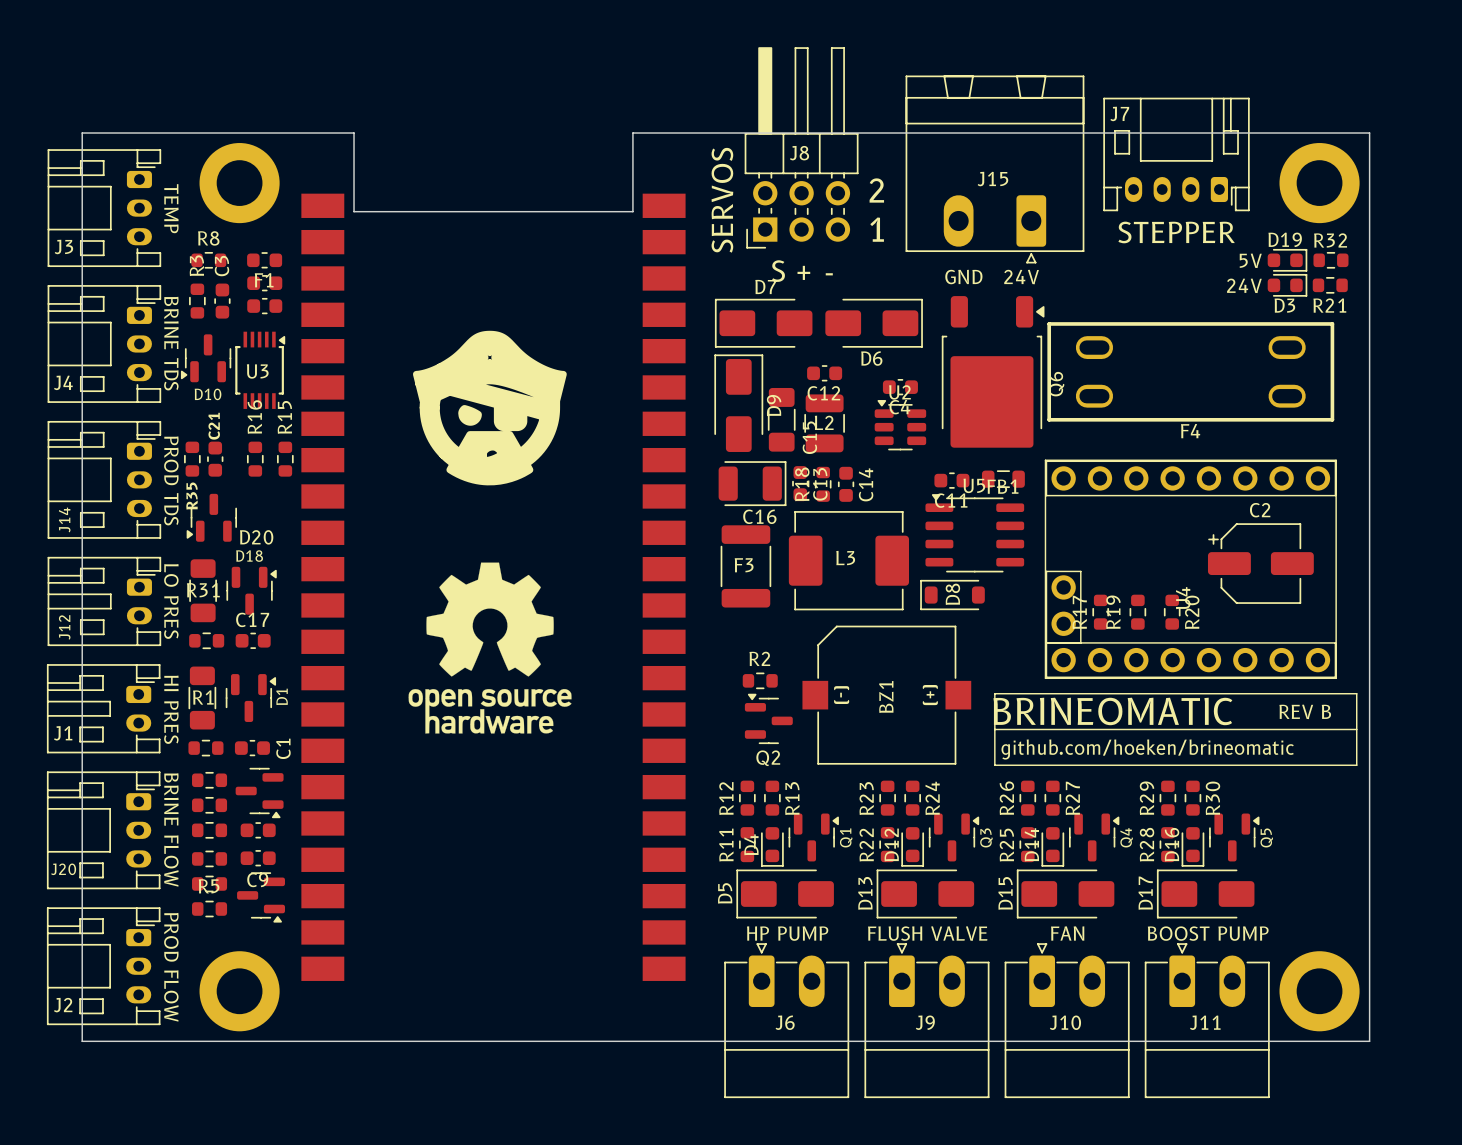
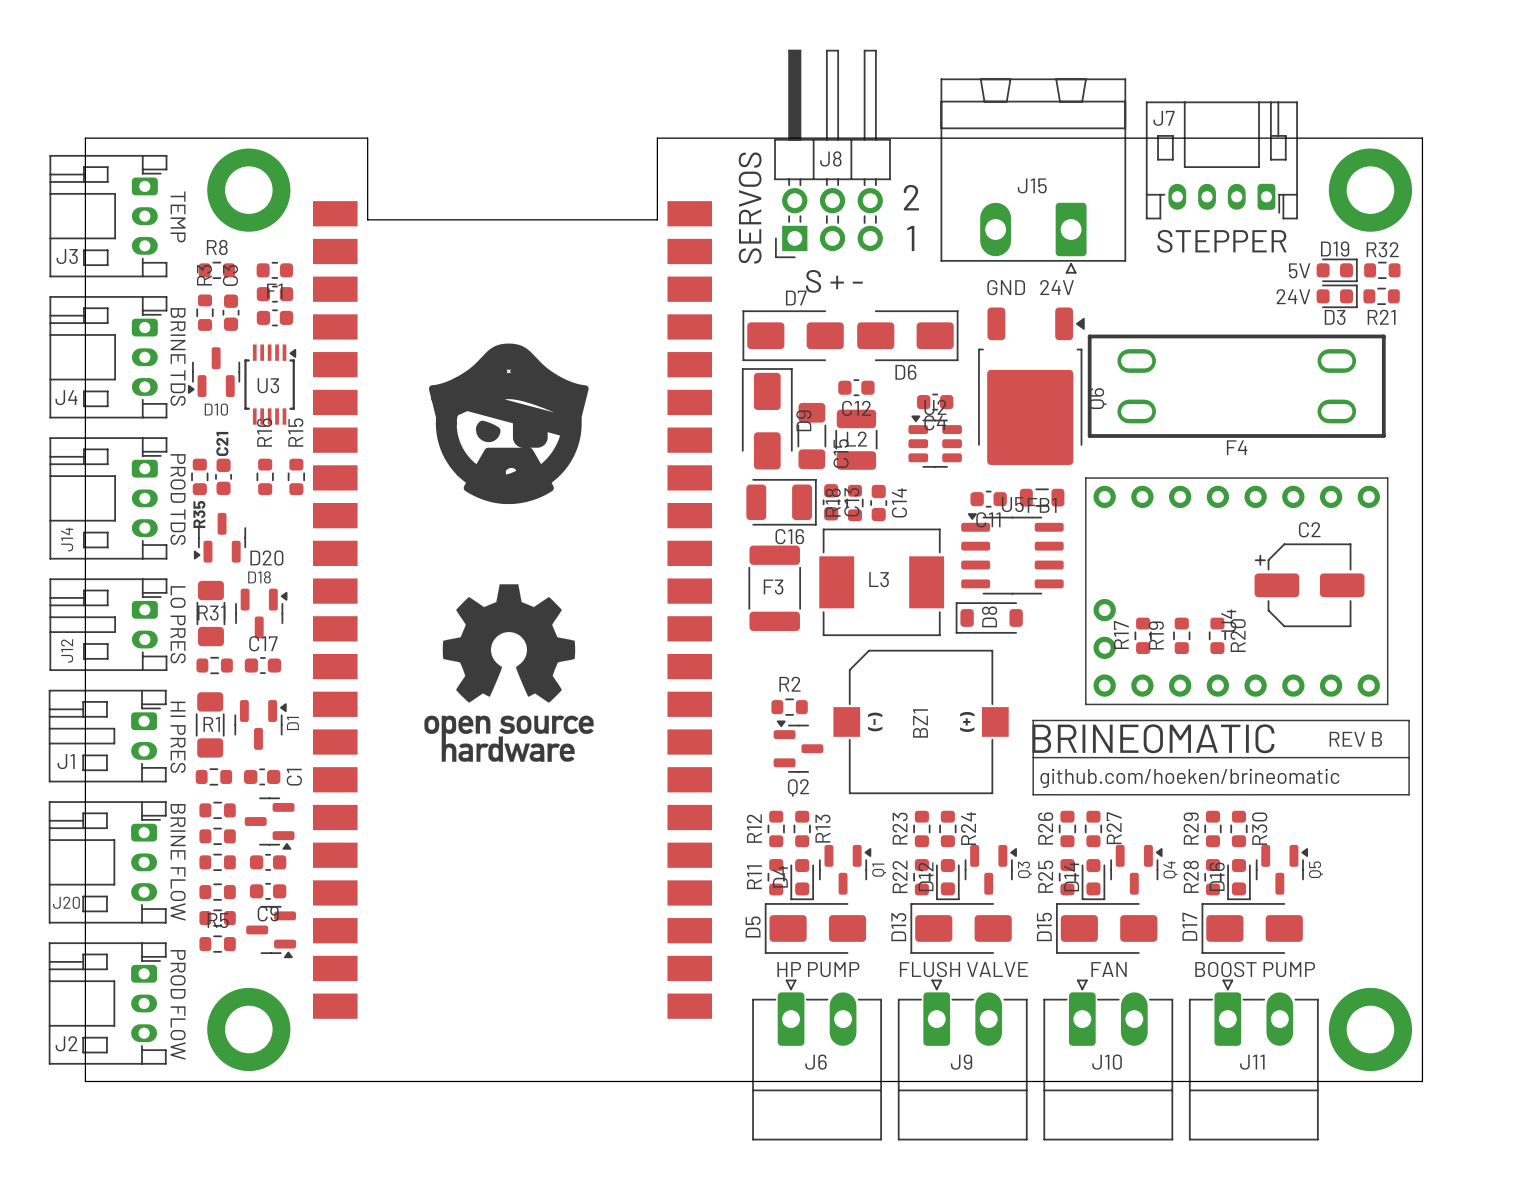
J8 footprint: [744, 47, 859, 249] -> [774, 49, 891, 259]
U4 footprint: [1044, 459, 1337, 679] -> [1085, 477, 1389, 706]
L3 footprint: [788, 511, 910, 611] -> [819, 528, 945, 637]

